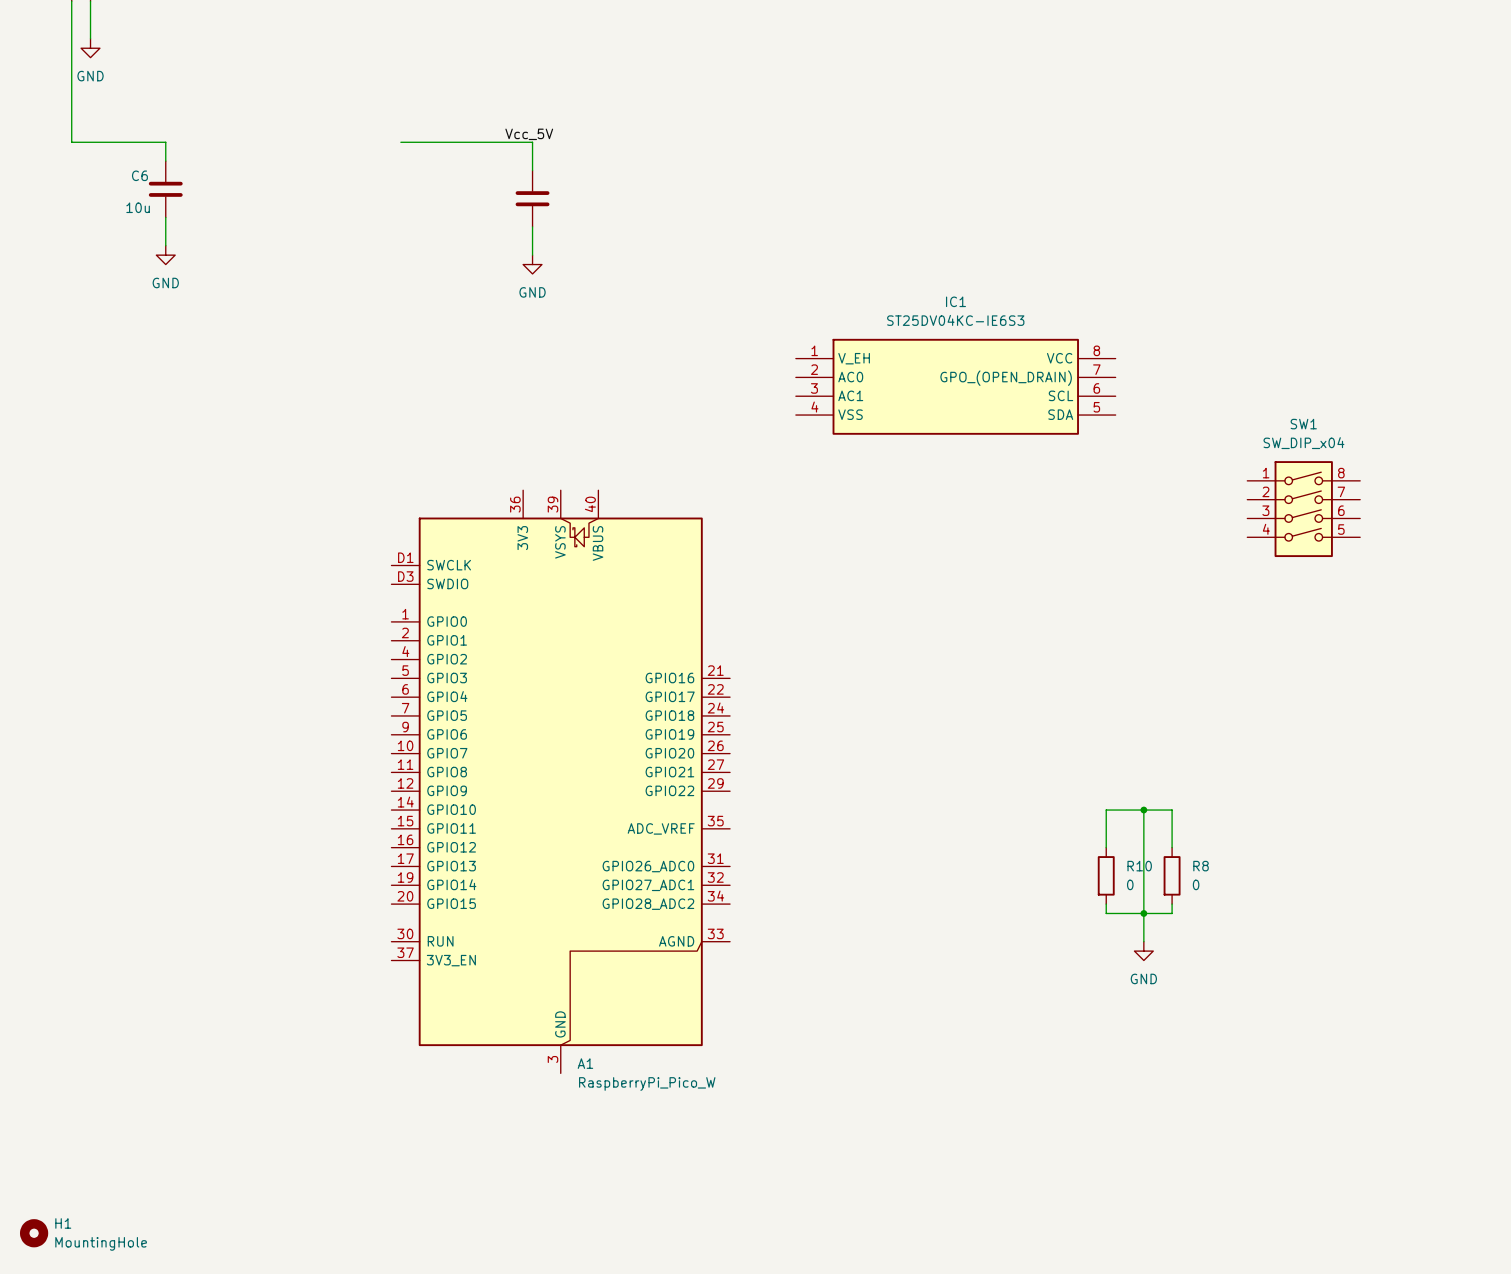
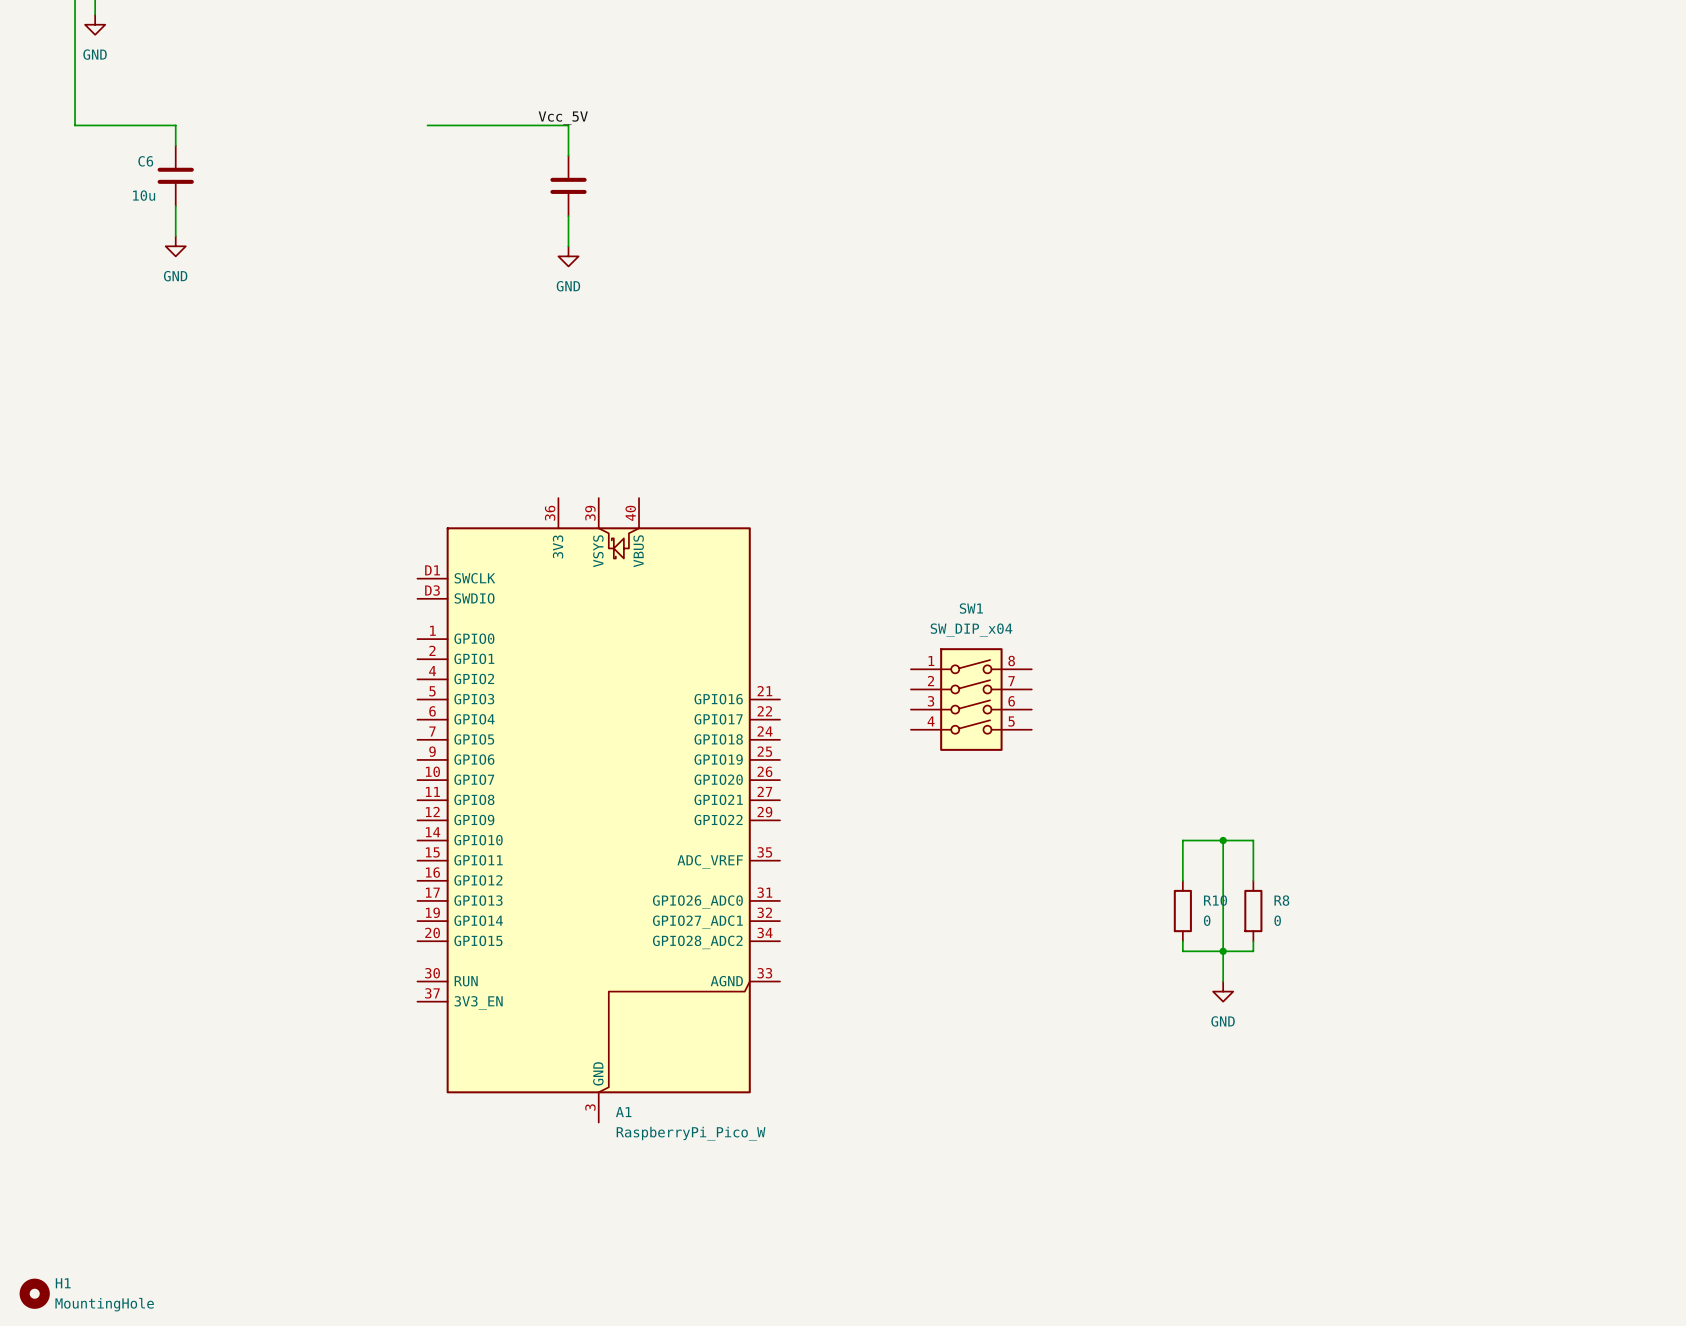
IC1: ST25DV04KC-IE6S3 (955, 386) -> none
SW1 position: (1303, 509) -> (971, 699)

